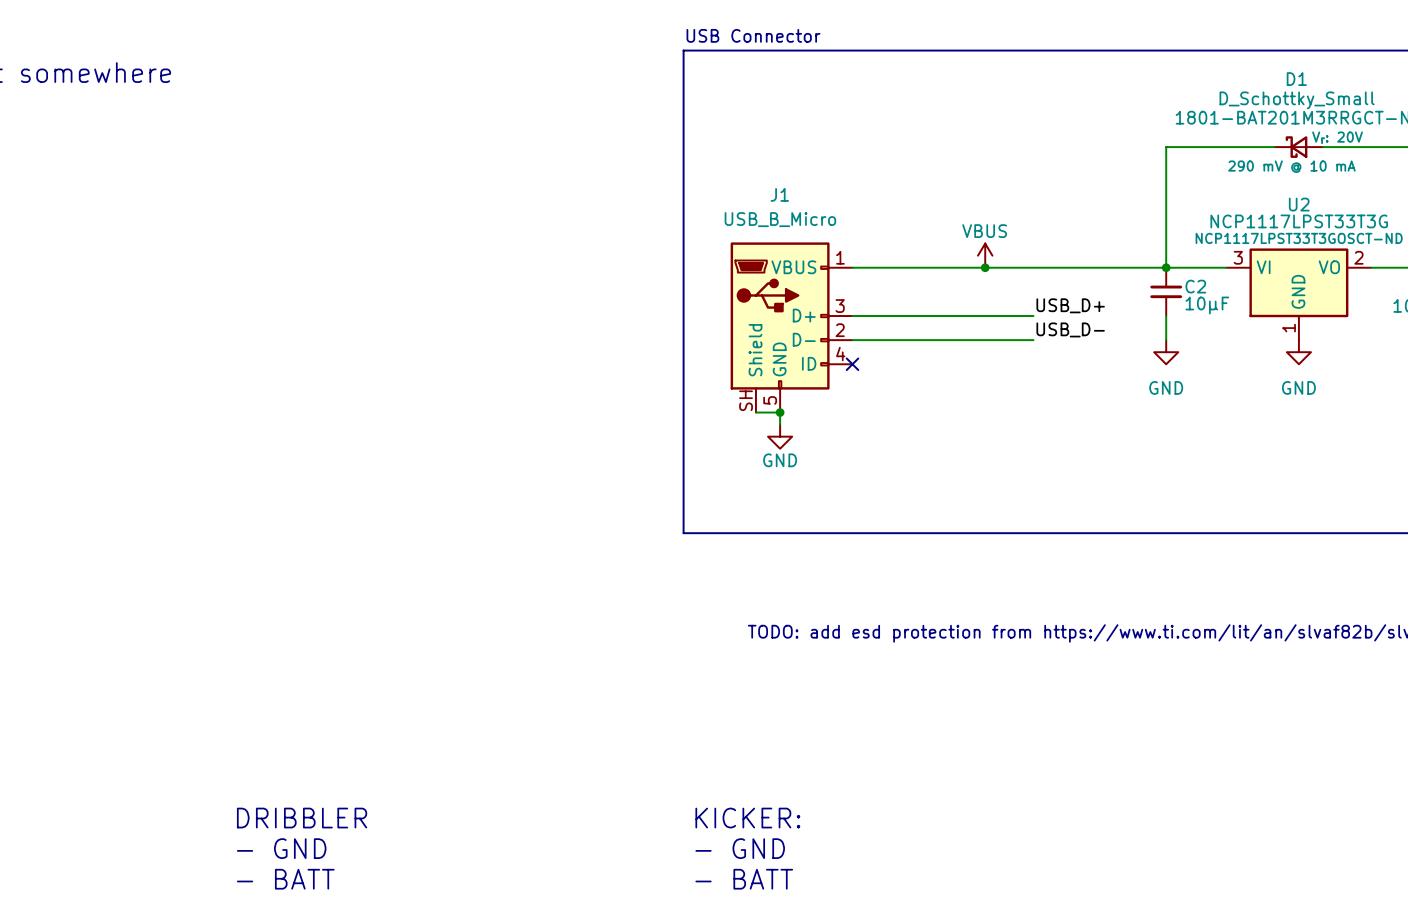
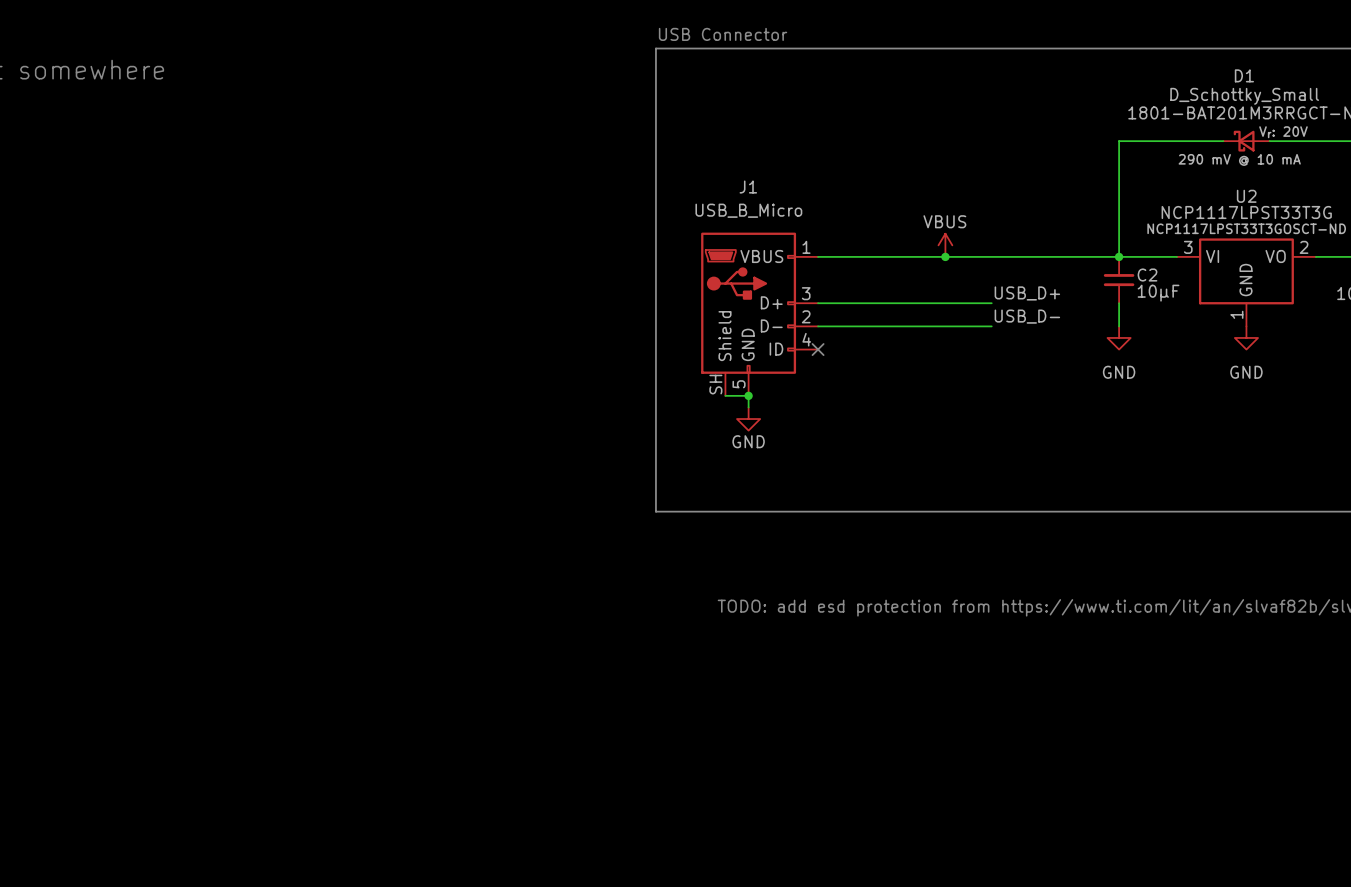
text: DRIBBLER (302, 818) -> none
text: KICKER: (747, 818) -> none
text: - GND (281, 848) -> none
text: - GND (740, 848) -> none
text: - BATT (285, 879) -> none
text: - BATT (744, 879) -> none

